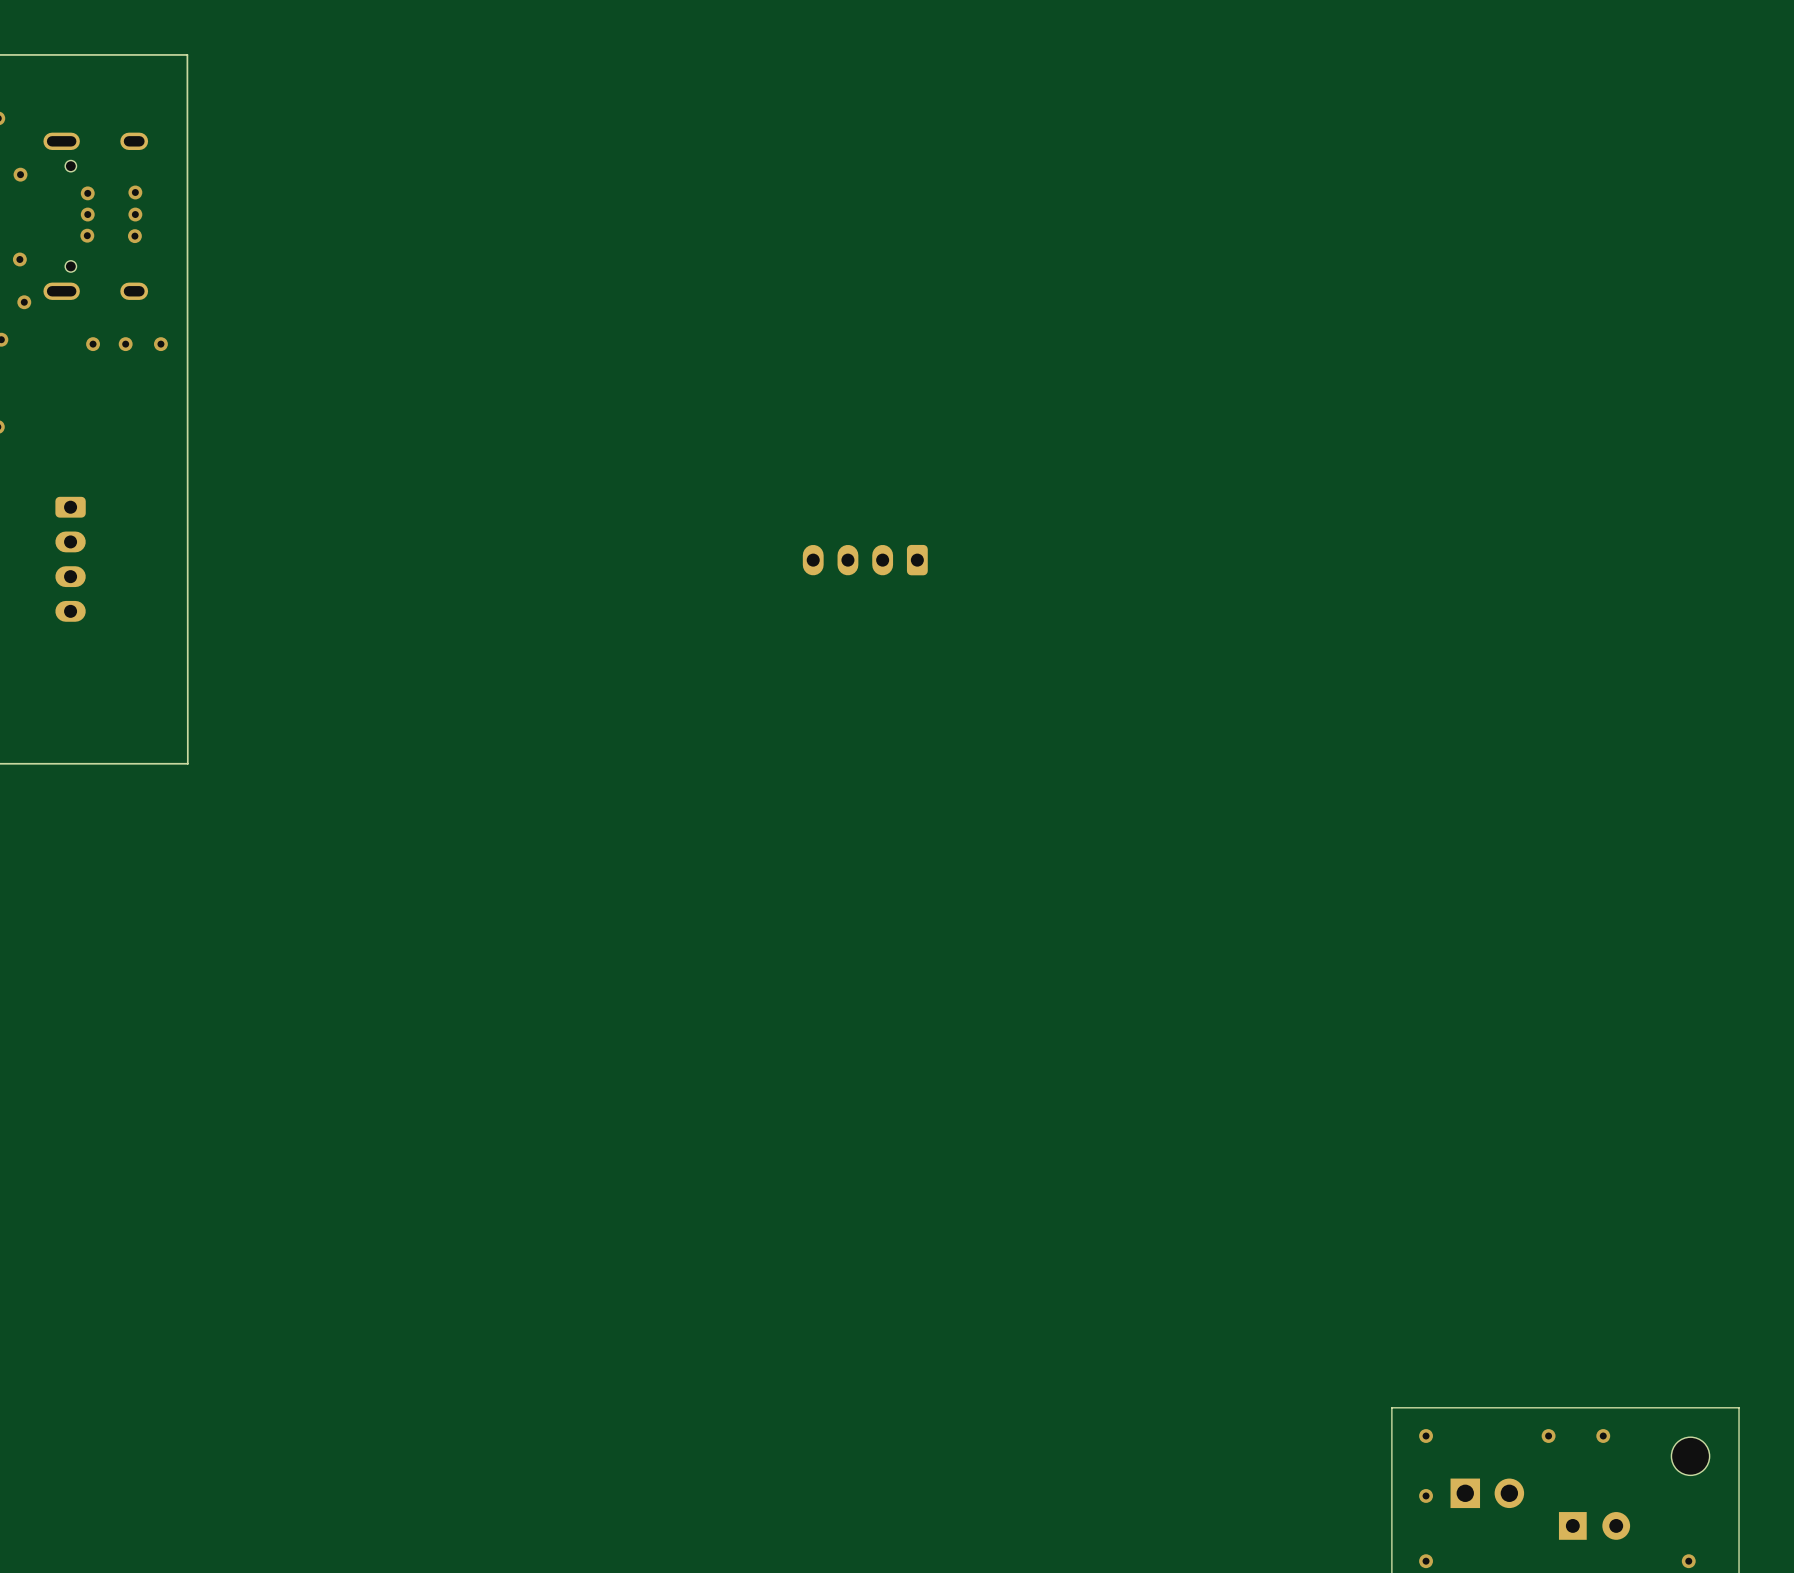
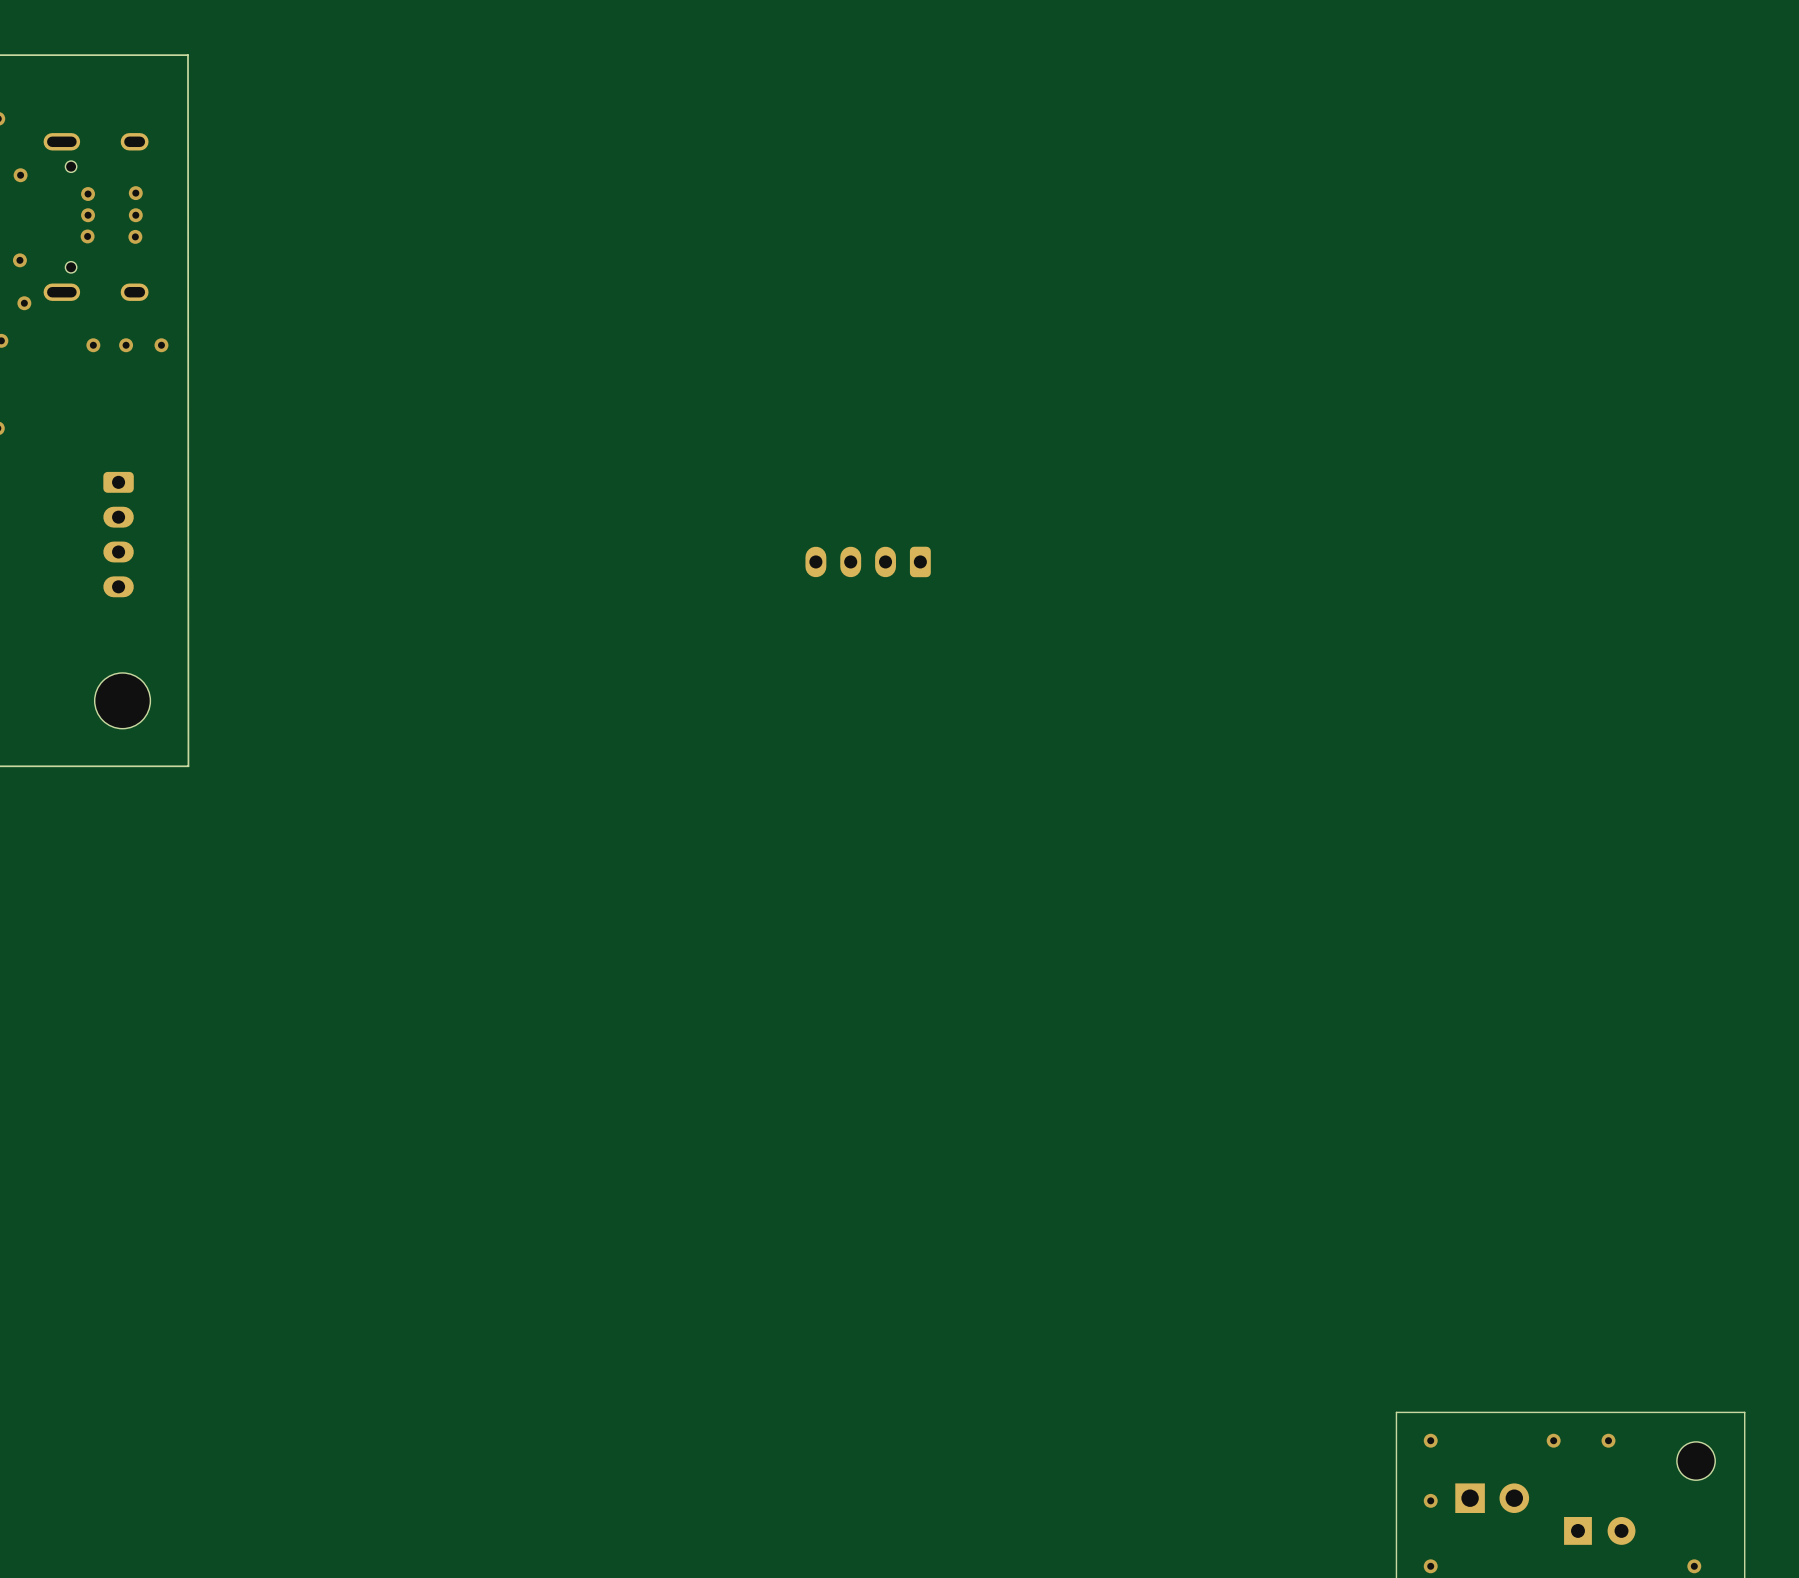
part position: (70, 559) -> (118, 534)
part: none -> (122, 700)

